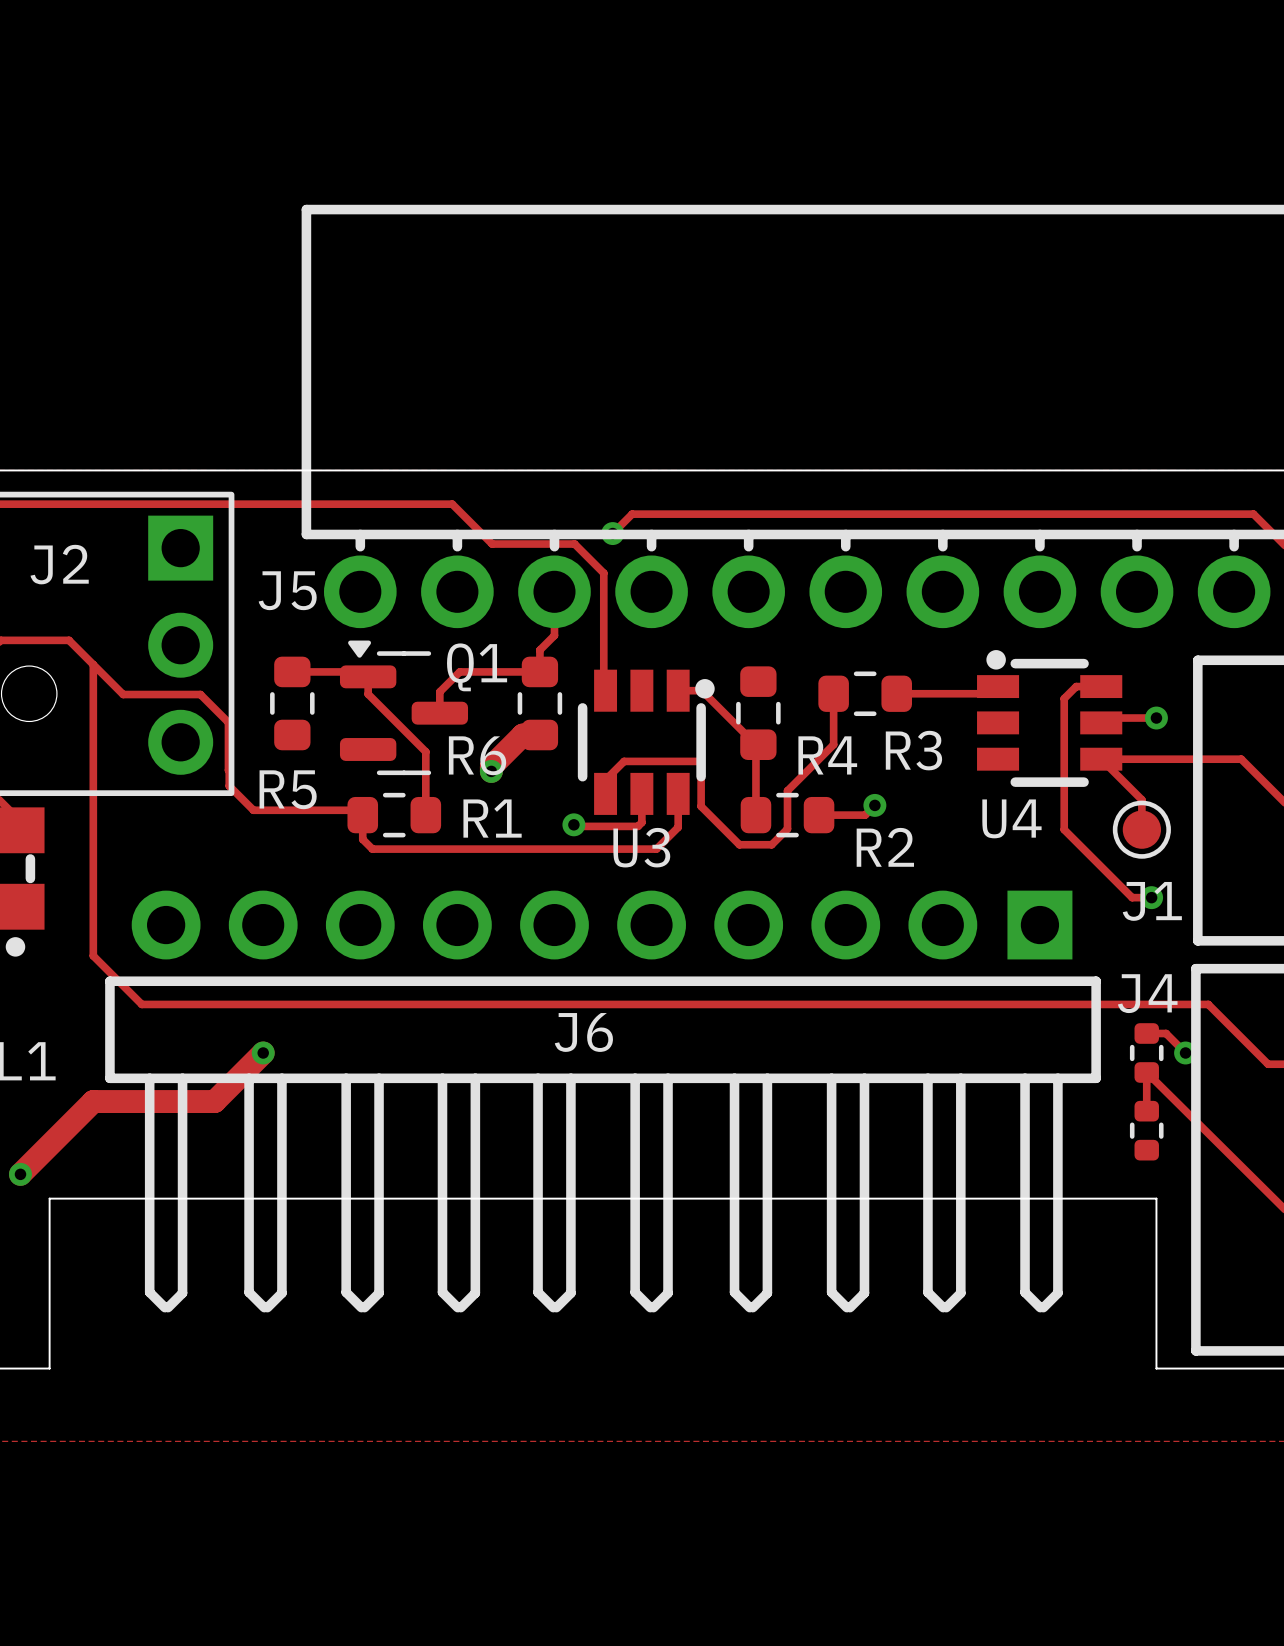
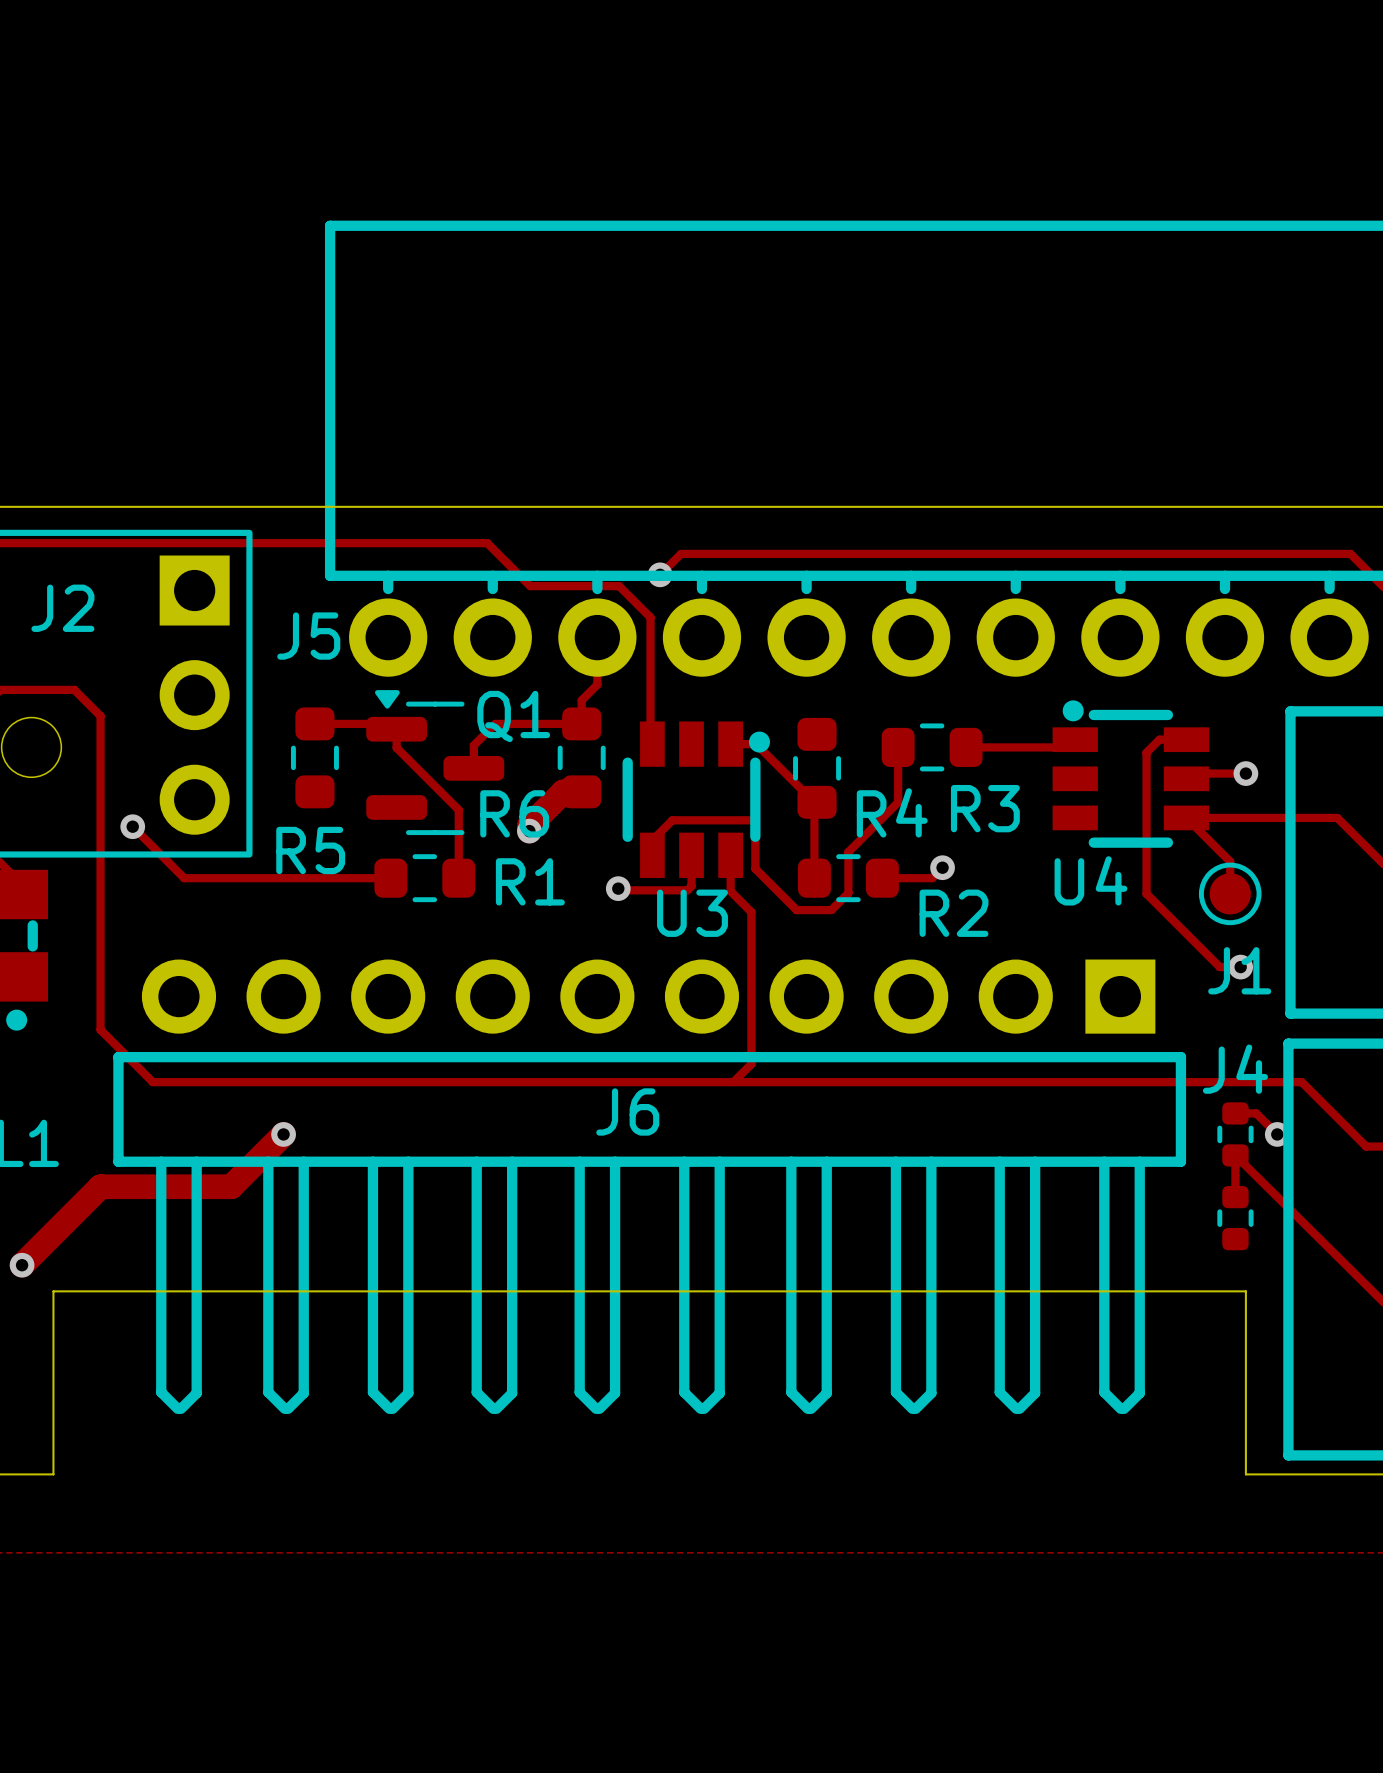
track: (93, 664) (123, 694) (200, 694) (228, 722) (229, 785) (253, 810) (357, 810) -> none
track: none -> (132, 826) (184, 878) (390, 878)
via: none -> (132, 826)
track: (362, 815) (362, 839) (372, 849) (656, 849) (678, 827) -> (733, 1082) (751, 1064) (751, 912) (730, 891)

